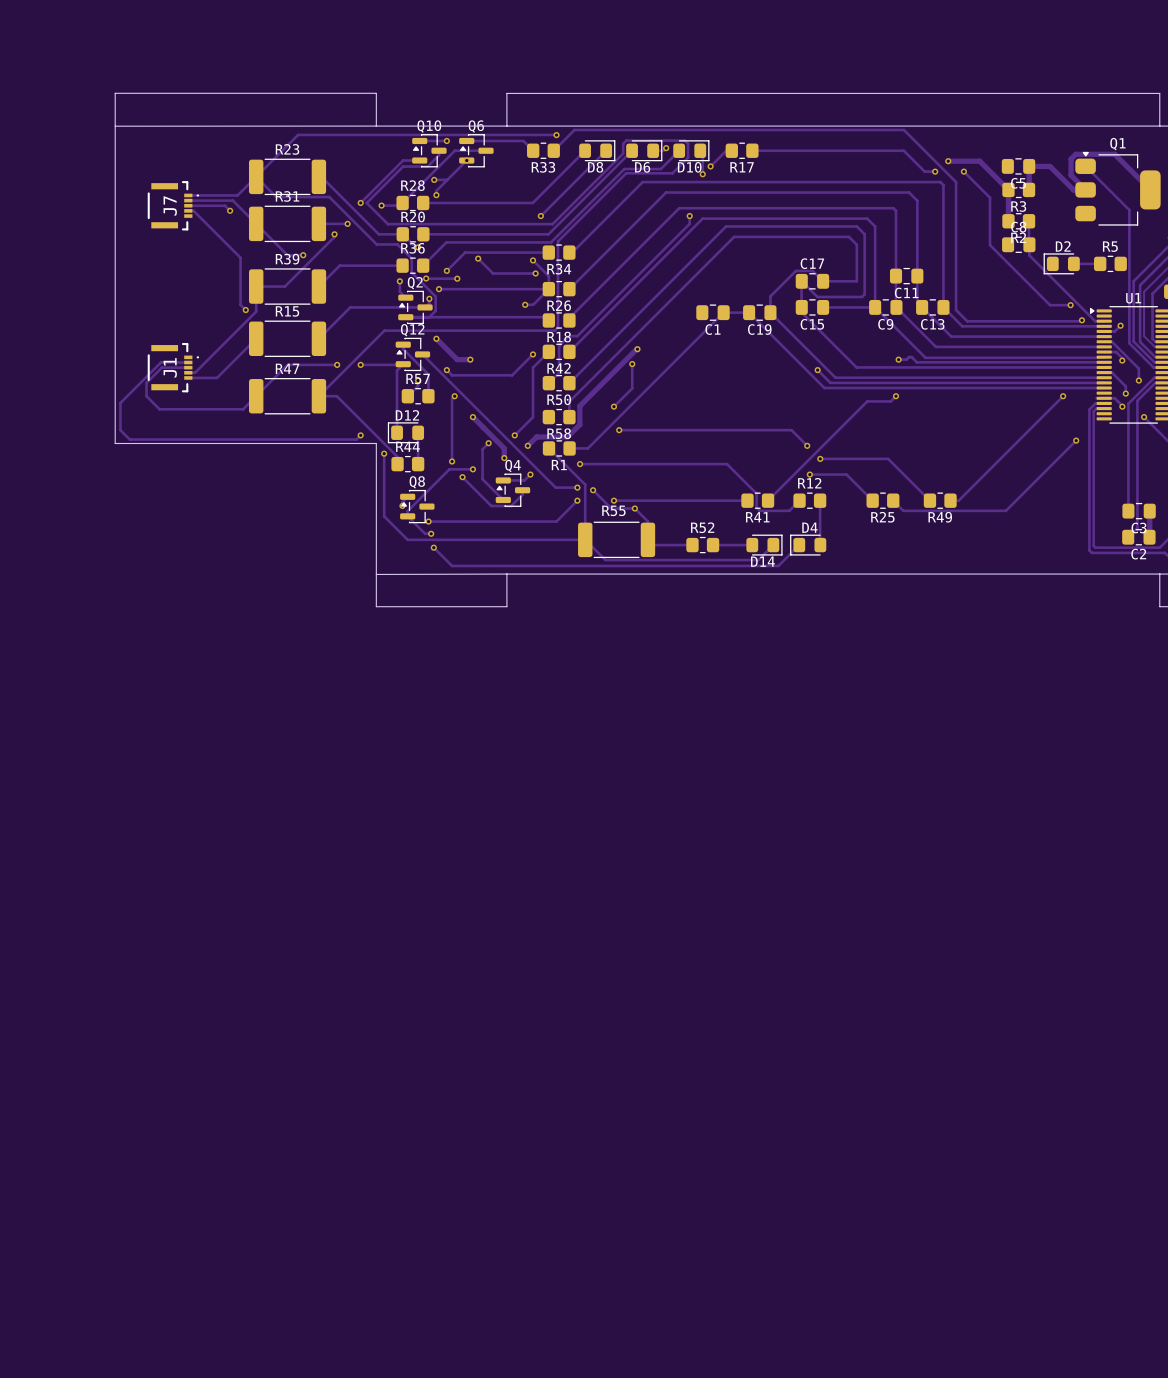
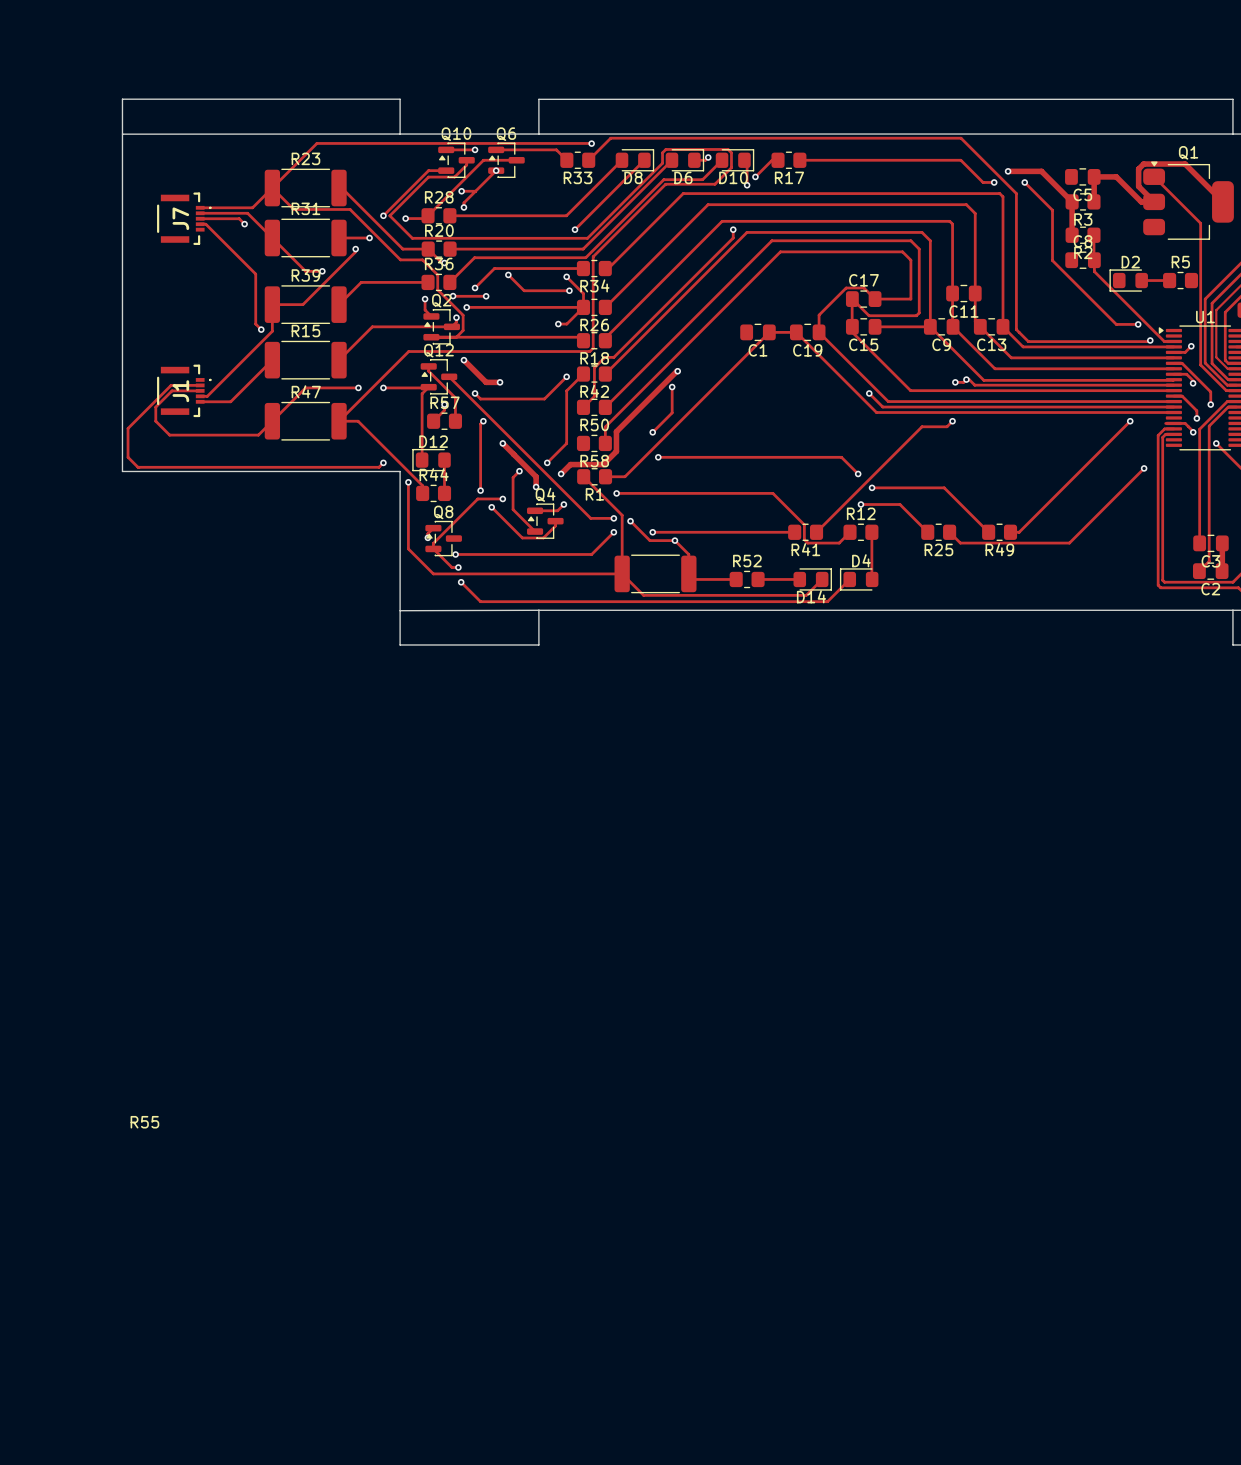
via: none -> (966, 379)
R55 name position: R55 (613, 510) -> R55 (144, 1122)

